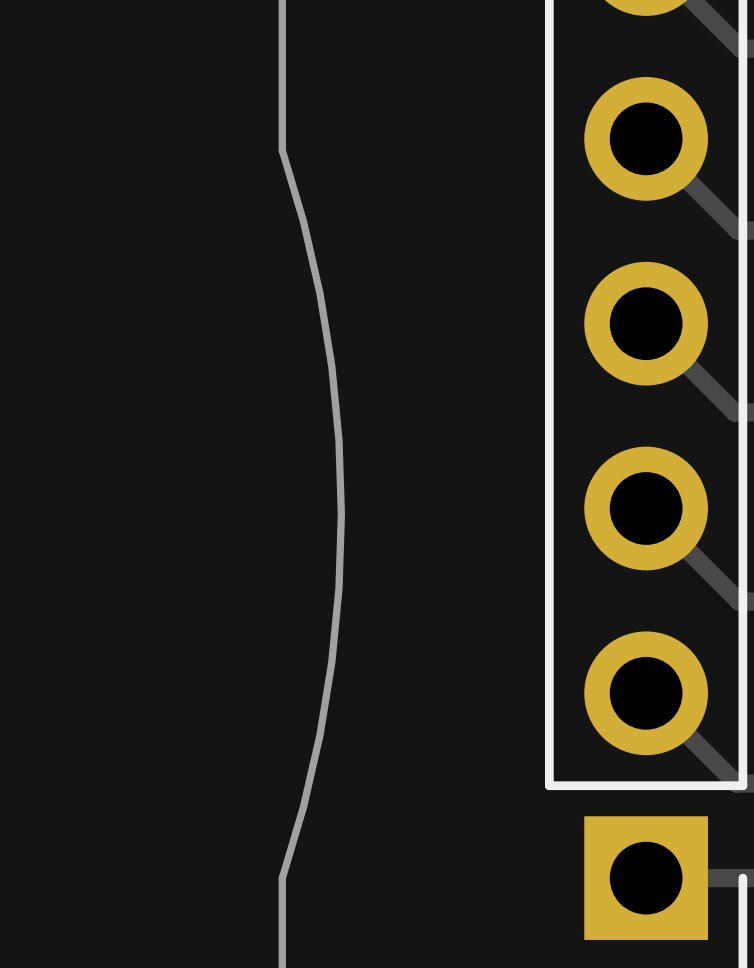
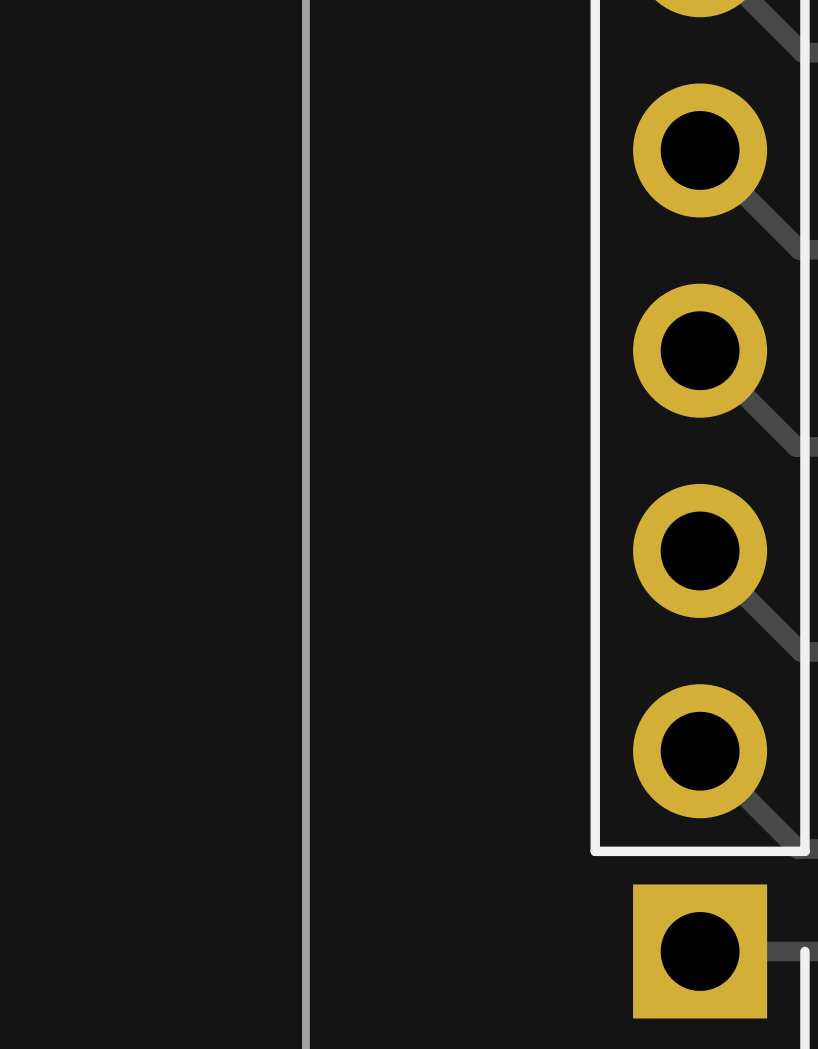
board edge: (282, 150) (303, 221) (320, 293) (331, 366) (338, 440) (341, 514) (338, 588) (331, 661) (320, 735) (303, 807) (282, 878) -> (305, 163) (305, 951)

